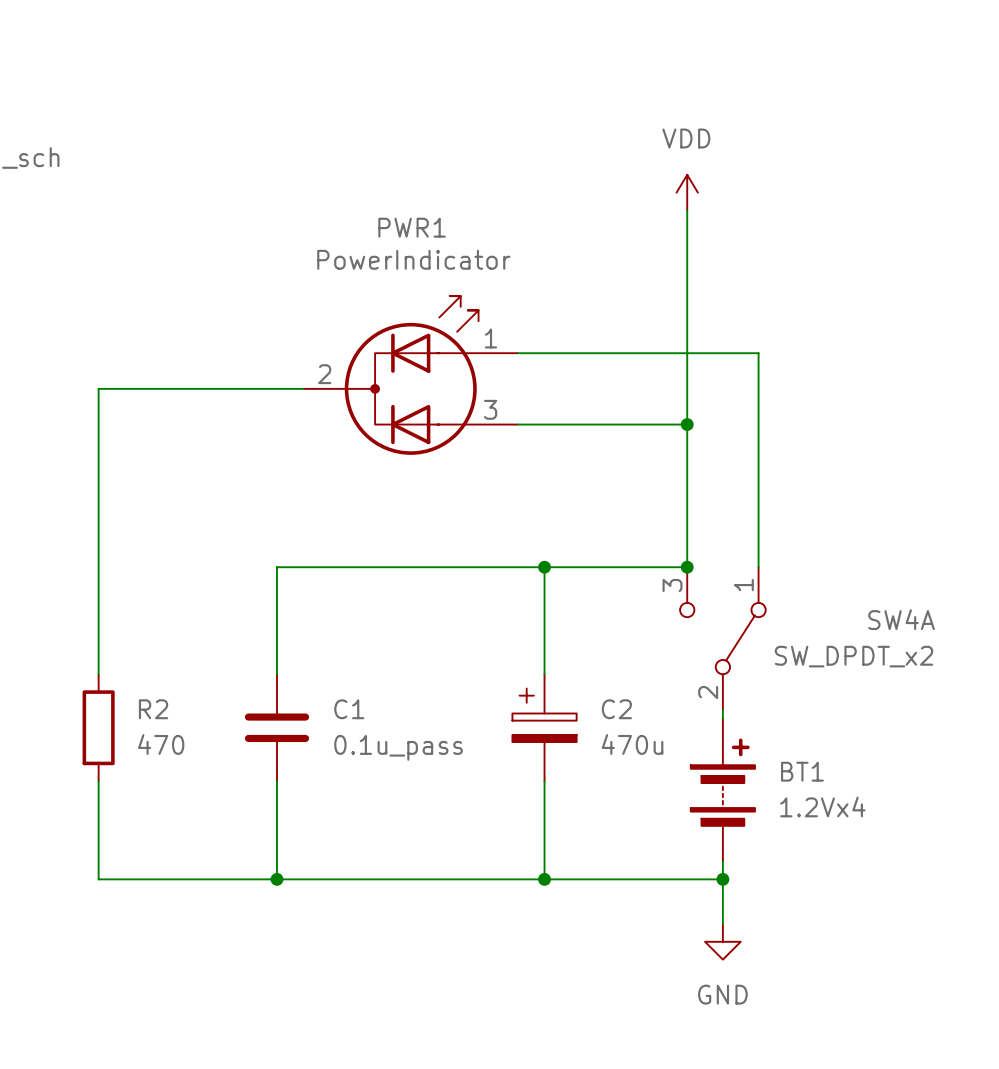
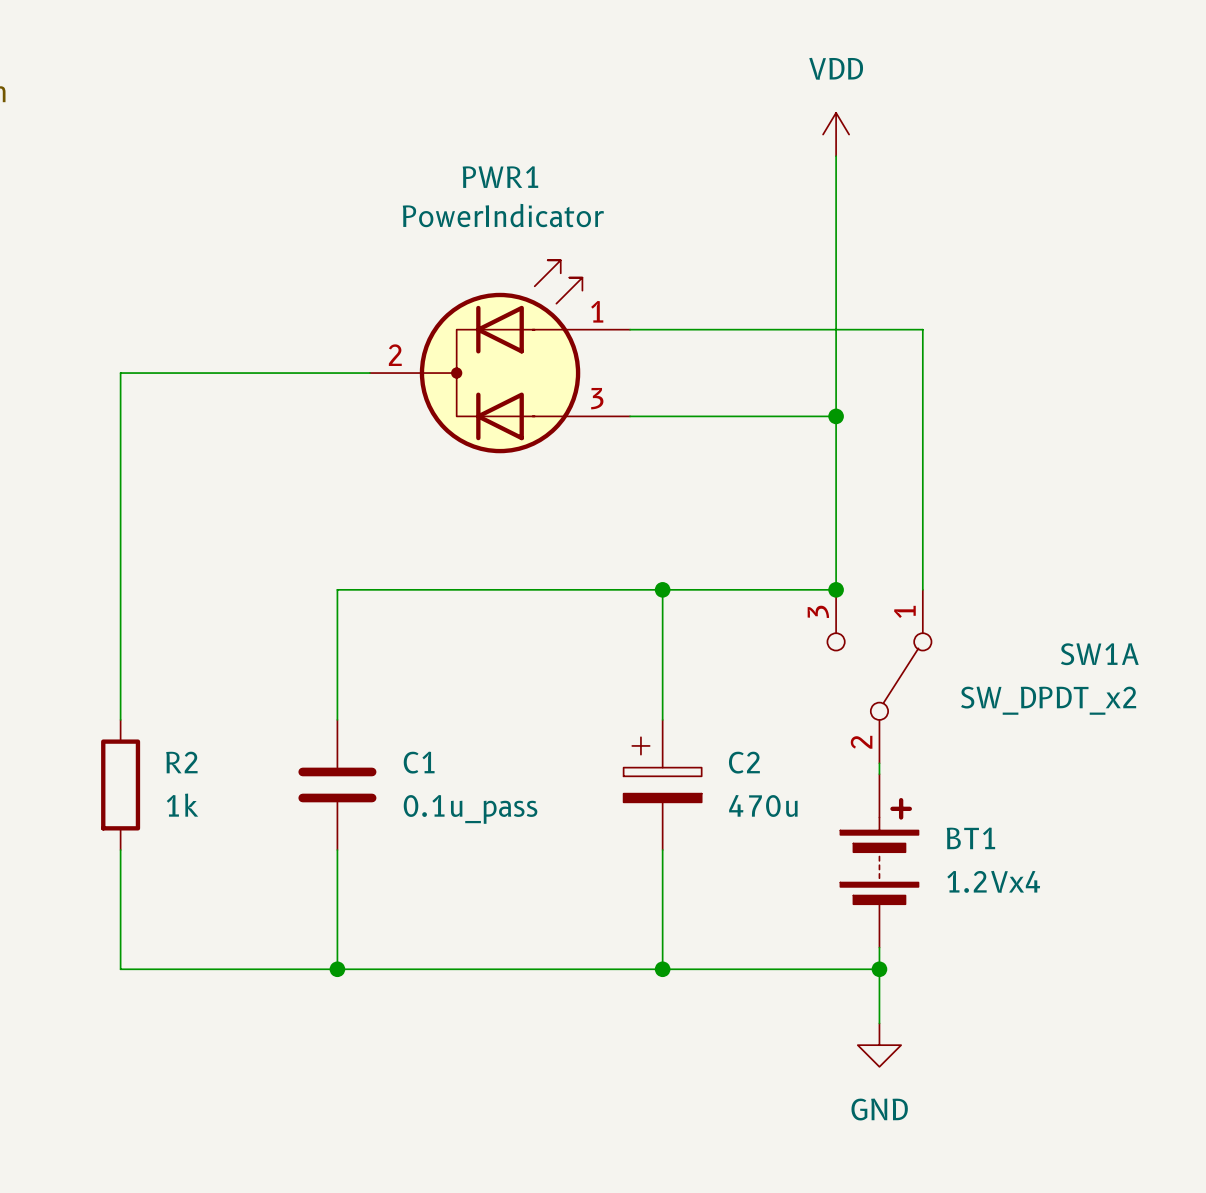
SW4A name: SW4A (901, 619) -> SW1A (1099, 654)
R2 value: 470 (161, 744) -> 1k (182, 805)

